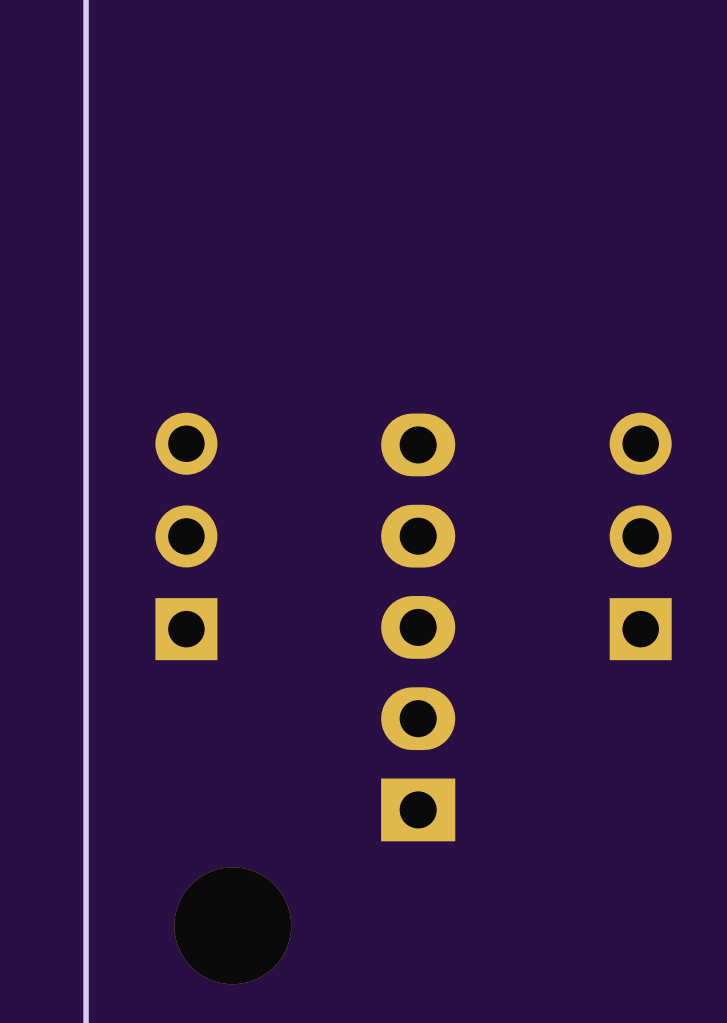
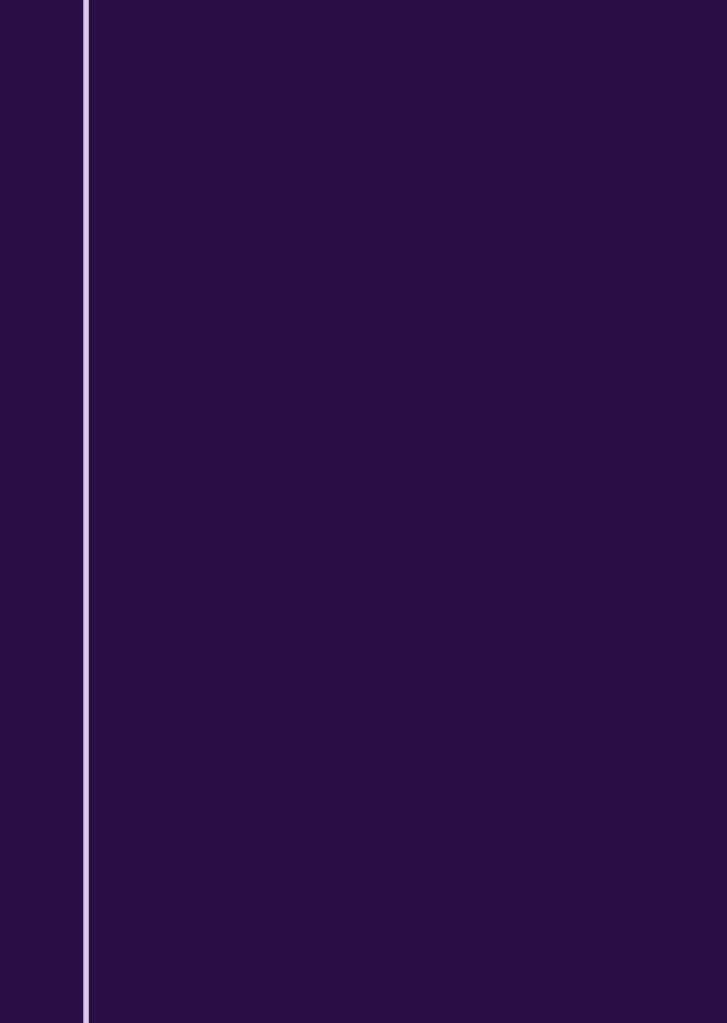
part: (186, 536) -> none
part: (640, 536) -> none
part: (418, 627) -> none
part: (232, 925) -> none

